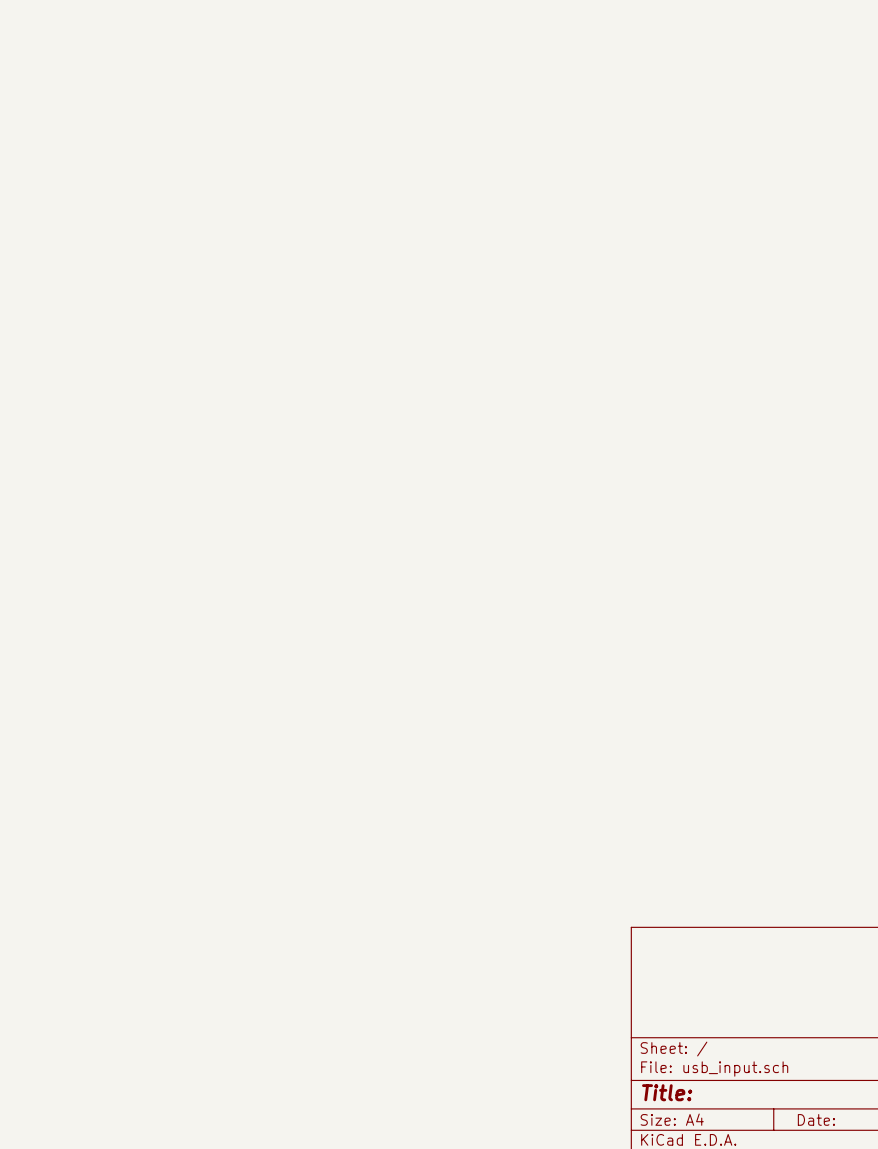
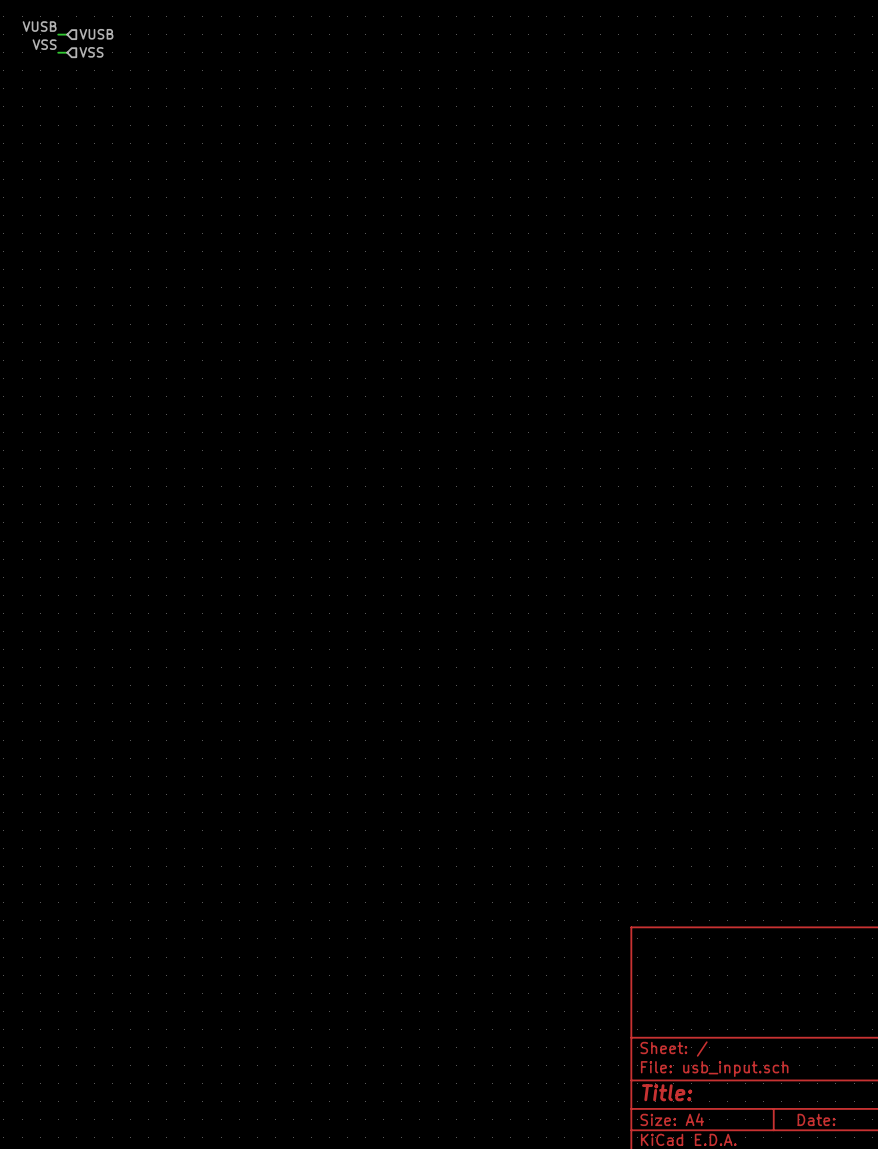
label: none -> VUSB (39, 26)
wire: none -> (58, 34) (67, 34)
hierarchical label: none -> VUSB (96, 34)
label: none -> VSS (44, 44)
wire: none -> (58, 52) (67, 52)
hierarchical label: none -> VSS (91, 52)

